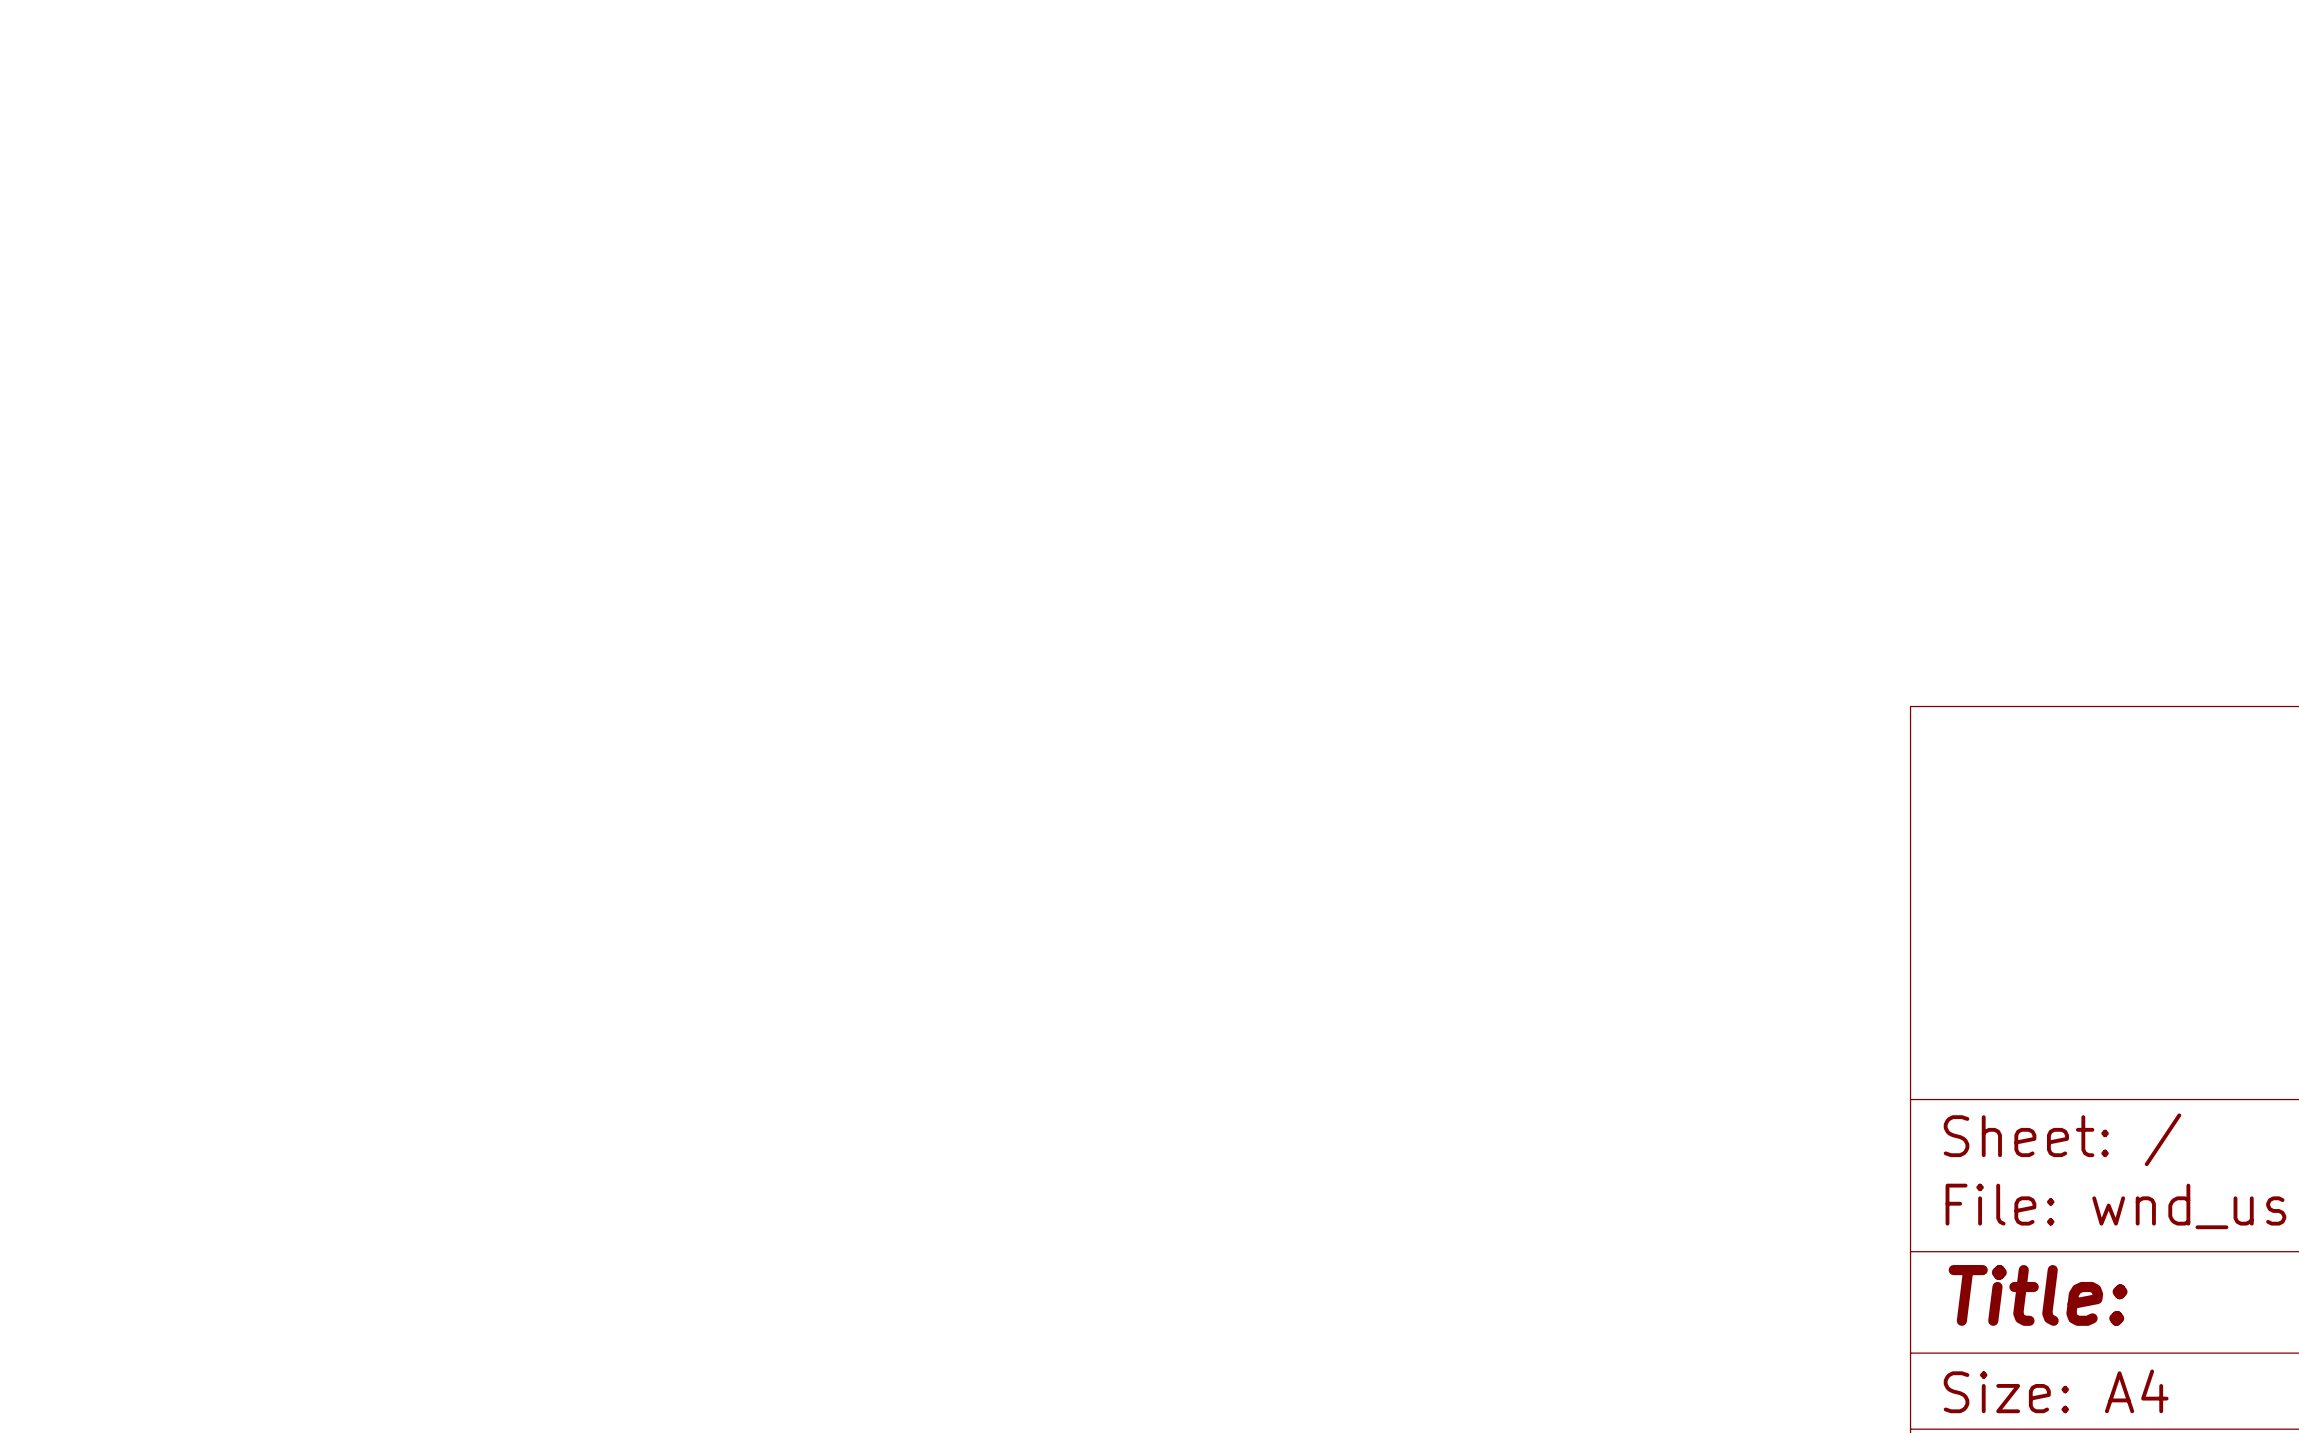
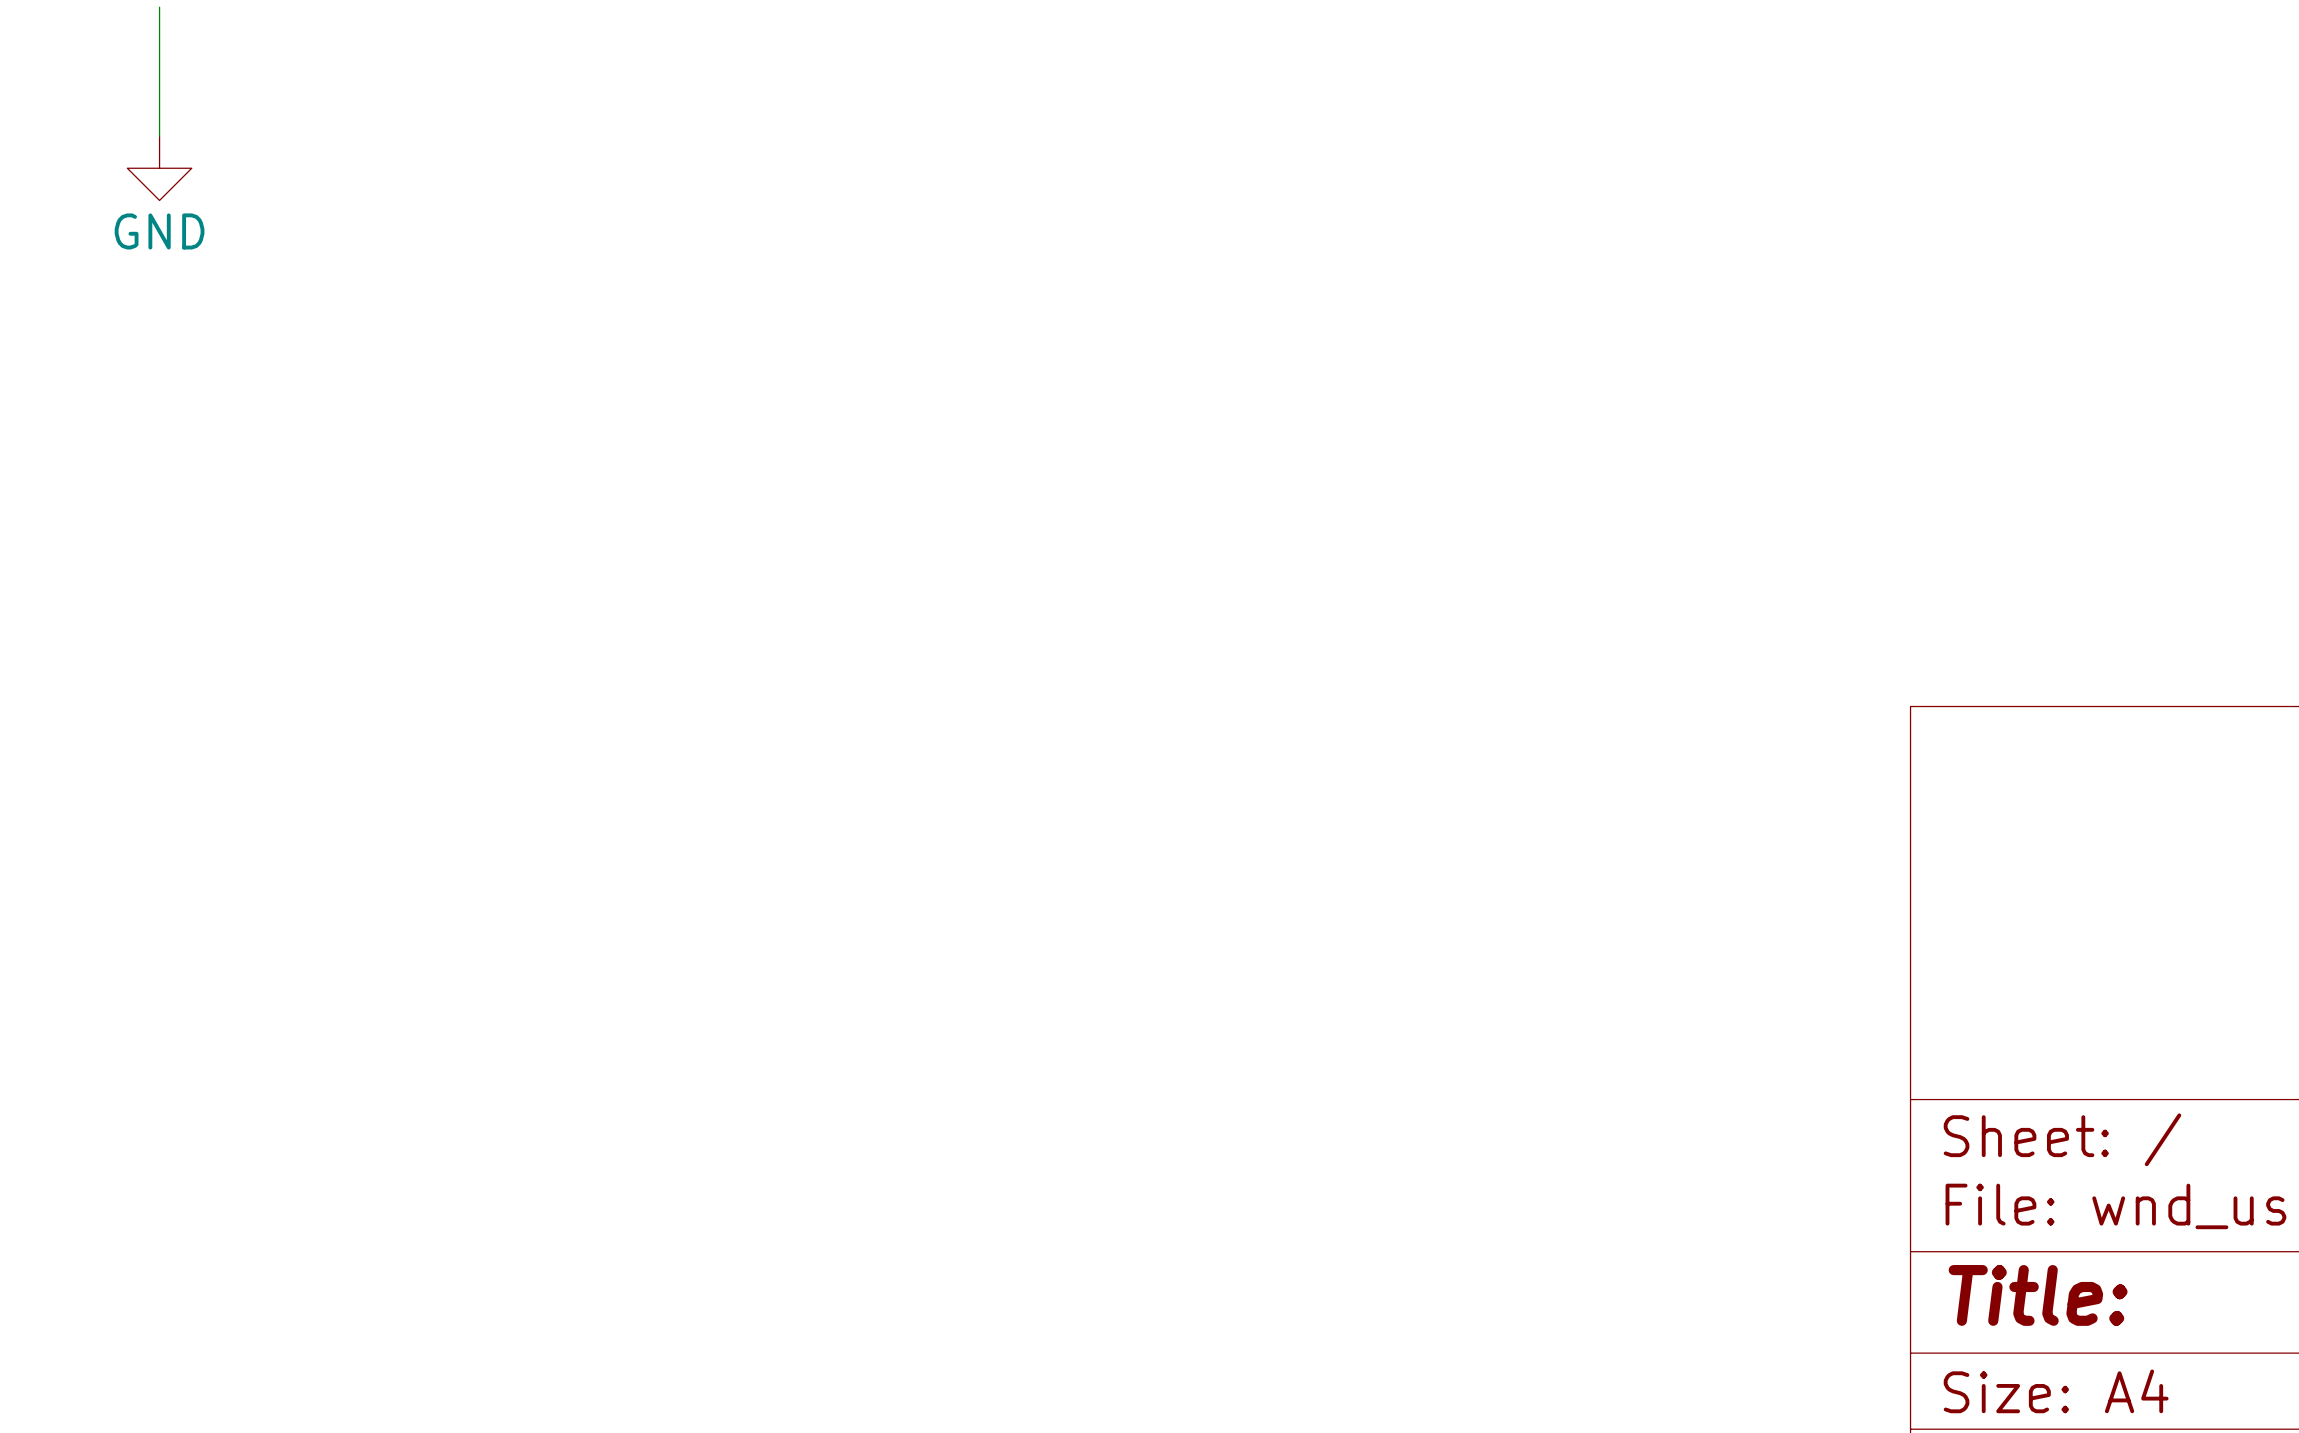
wire: none -> (159, 7) (159, 136)
power symbol: none -> GND (159, 168)

